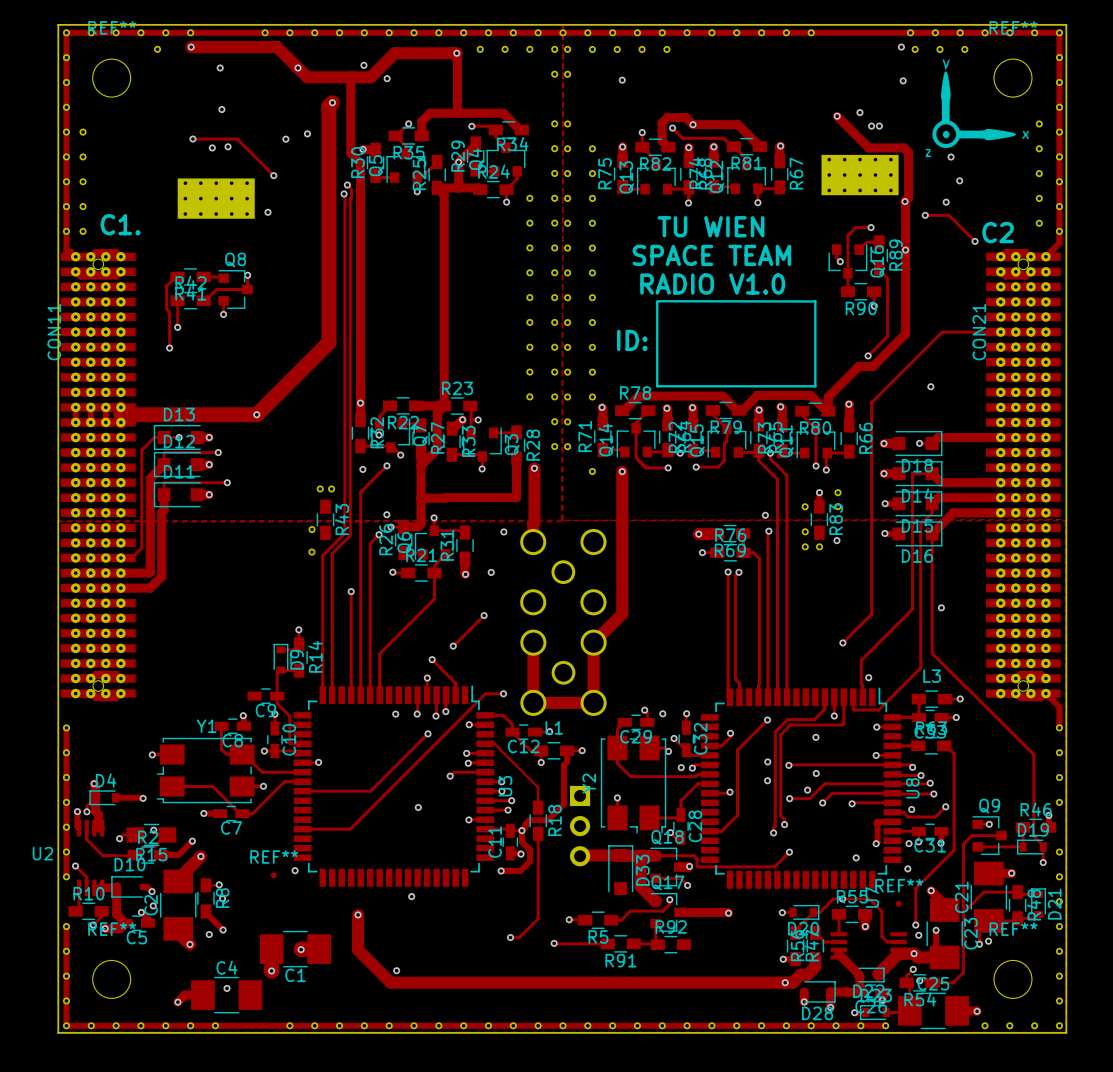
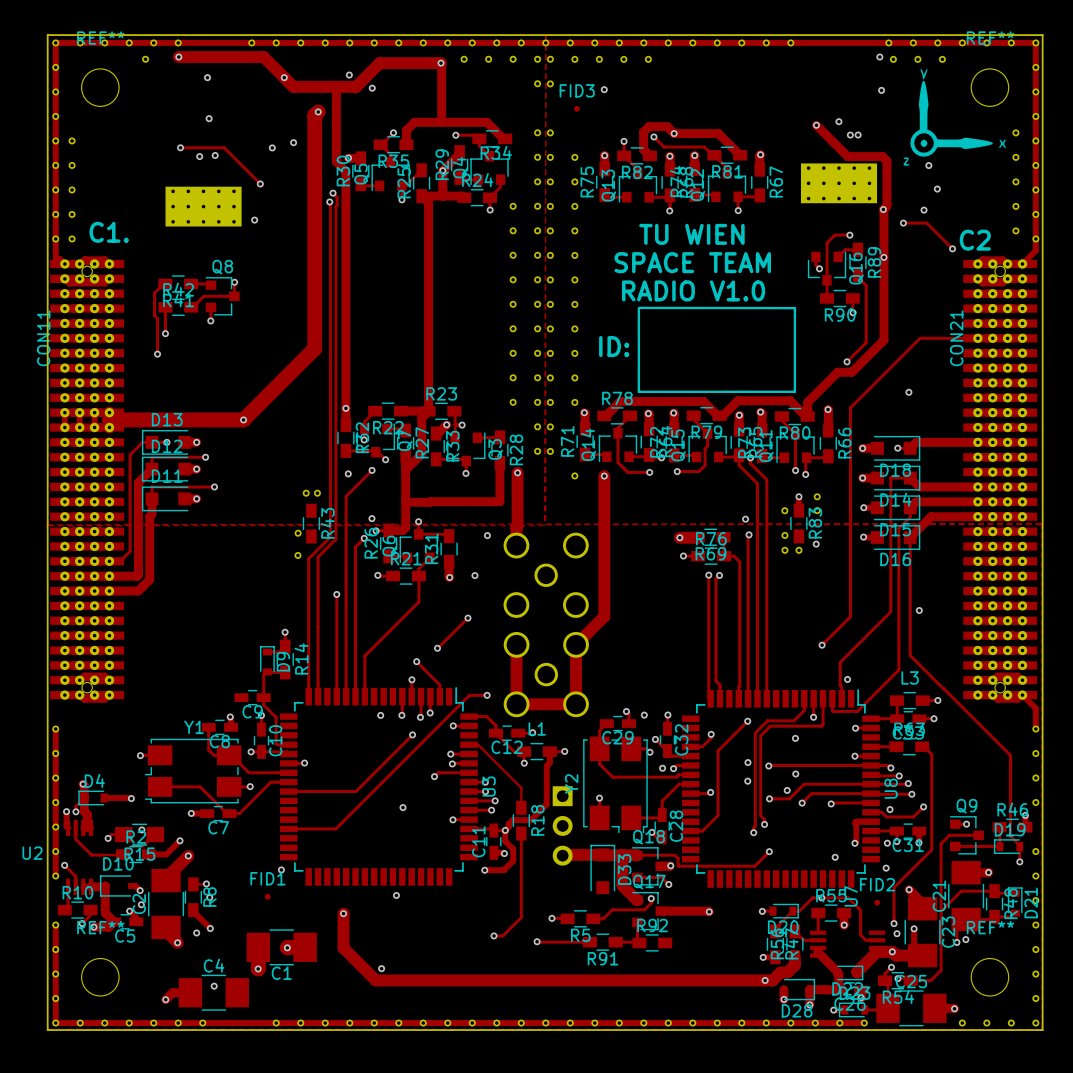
FID3: none -> (576, 108)
REF**: (273, 875) -> none
REF** name: REF** (899, 885) -> FID2 (877, 884)
FID1: none -> (267, 896)

